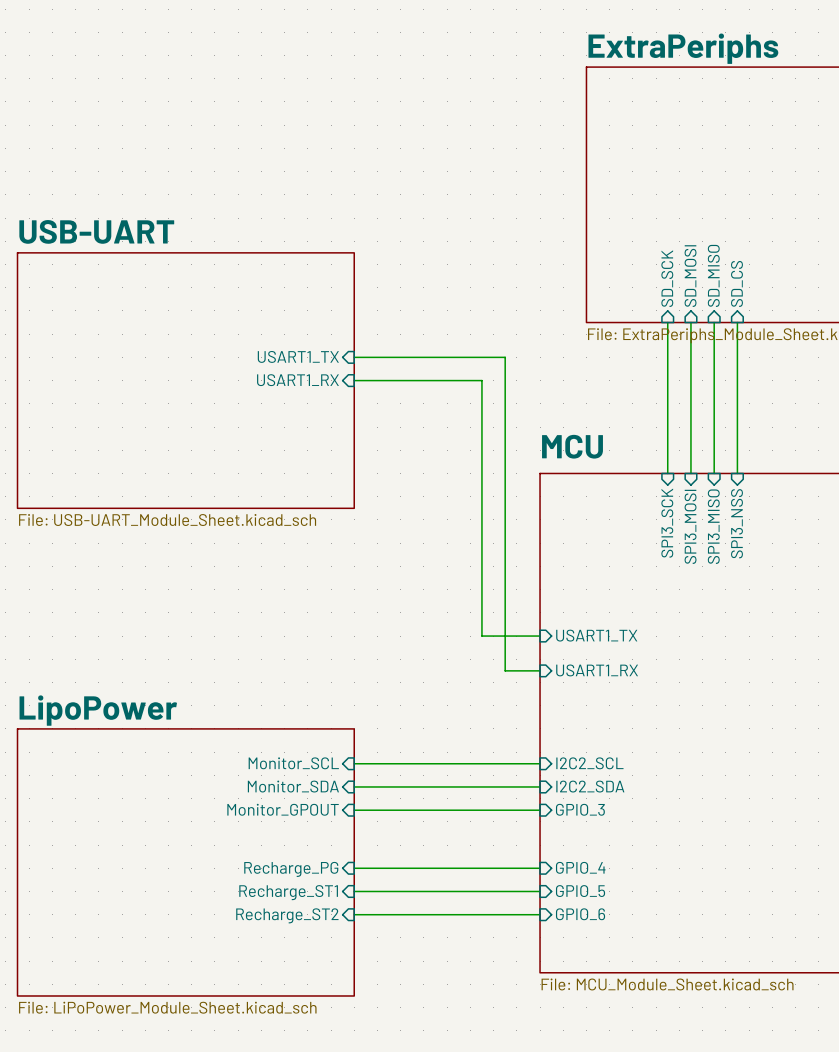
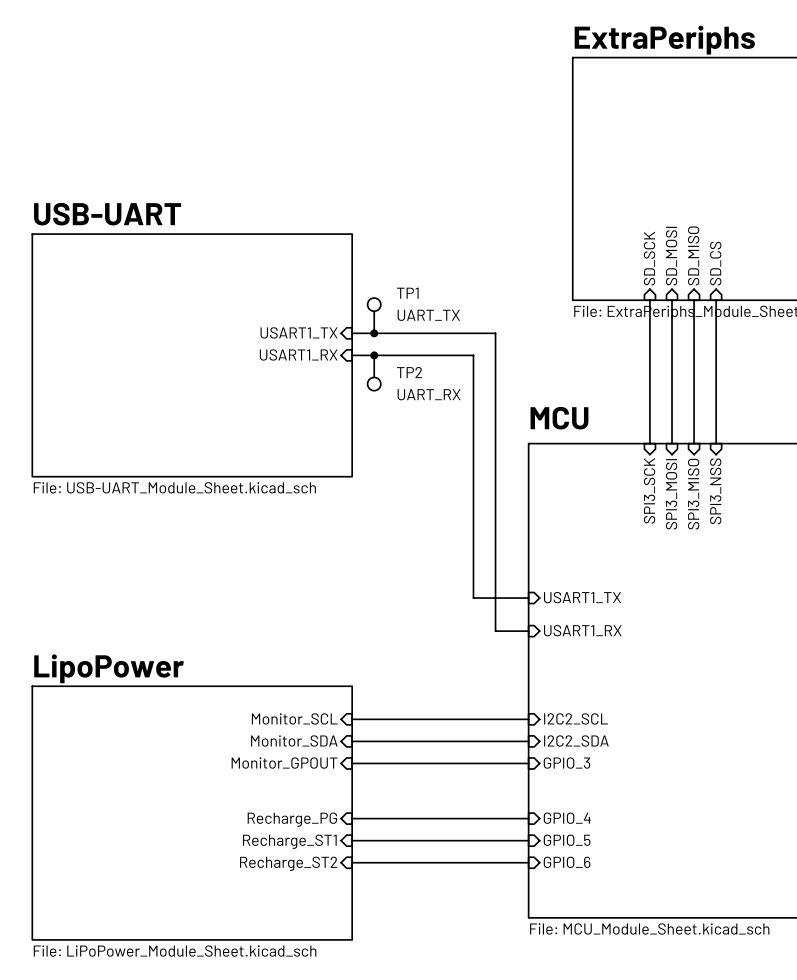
TP1: none -> UART_TX (374, 315)
junction: none -> (374, 333)
junction: none -> (374, 355)
TP2: none -> UART_RX (374, 373)

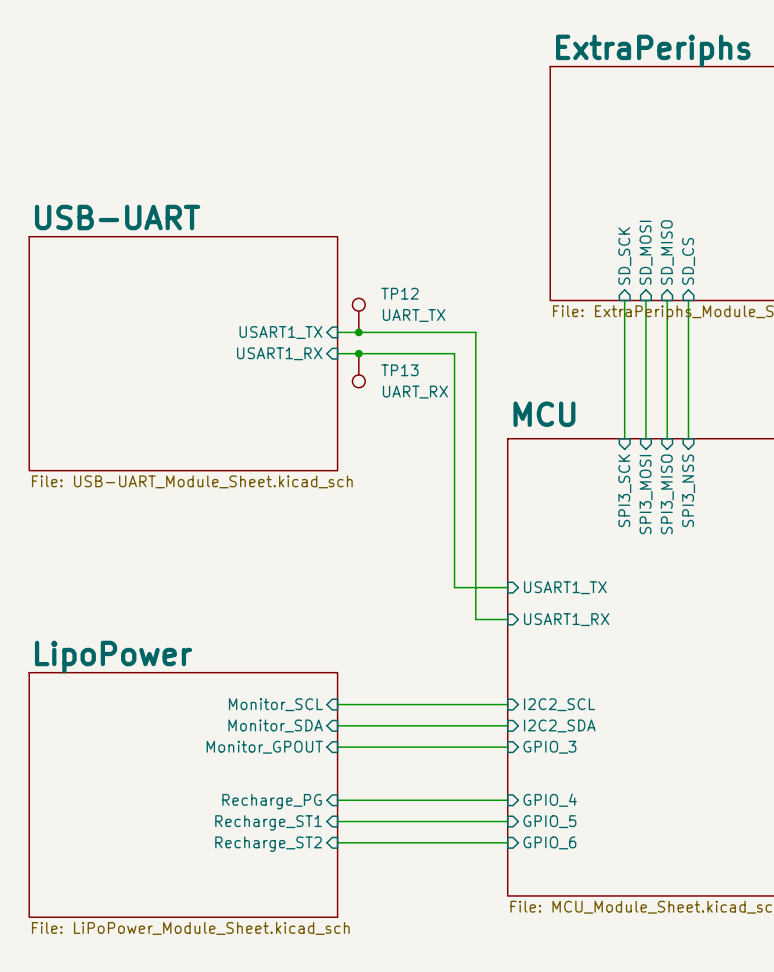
TP1 name: TP1 (407, 293) -> TP12 (399, 293)
TP2 name: TP2 (409, 372) -> TP13 (399, 370)

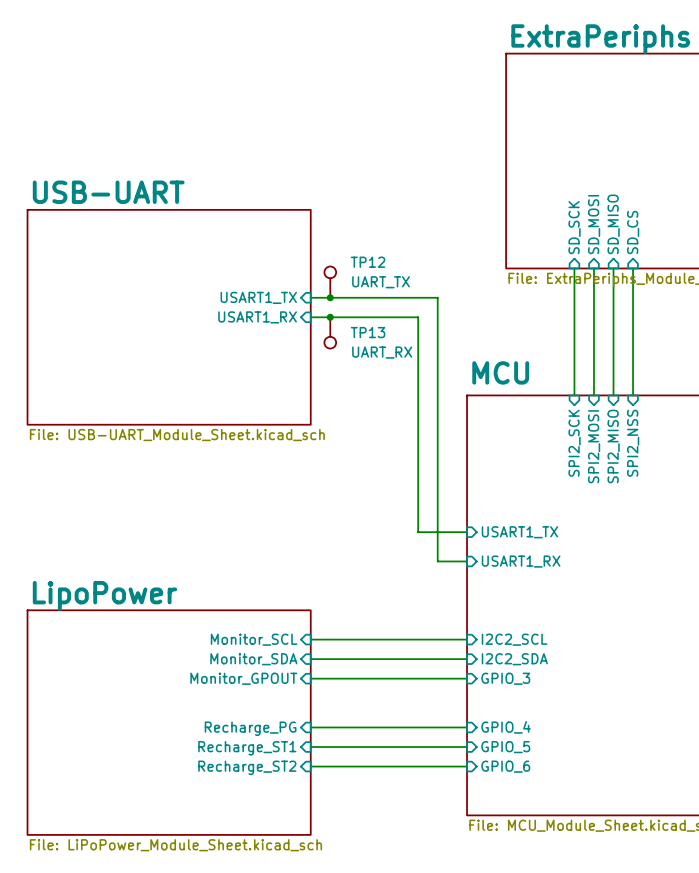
sheet pin: SPI3_SCK (624, 490) -> SPI2_SCK (574, 443)
sheet pin: SPI3_NSS (688, 490) -> SPI2_NSS (633, 443)
sheet pin: SPI3_MOSI (646, 494) -> SPI2_MOSI (594, 446)
sheet pin: SPI3_MISO (667, 494) -> SPI2_MISO (613, 446)

